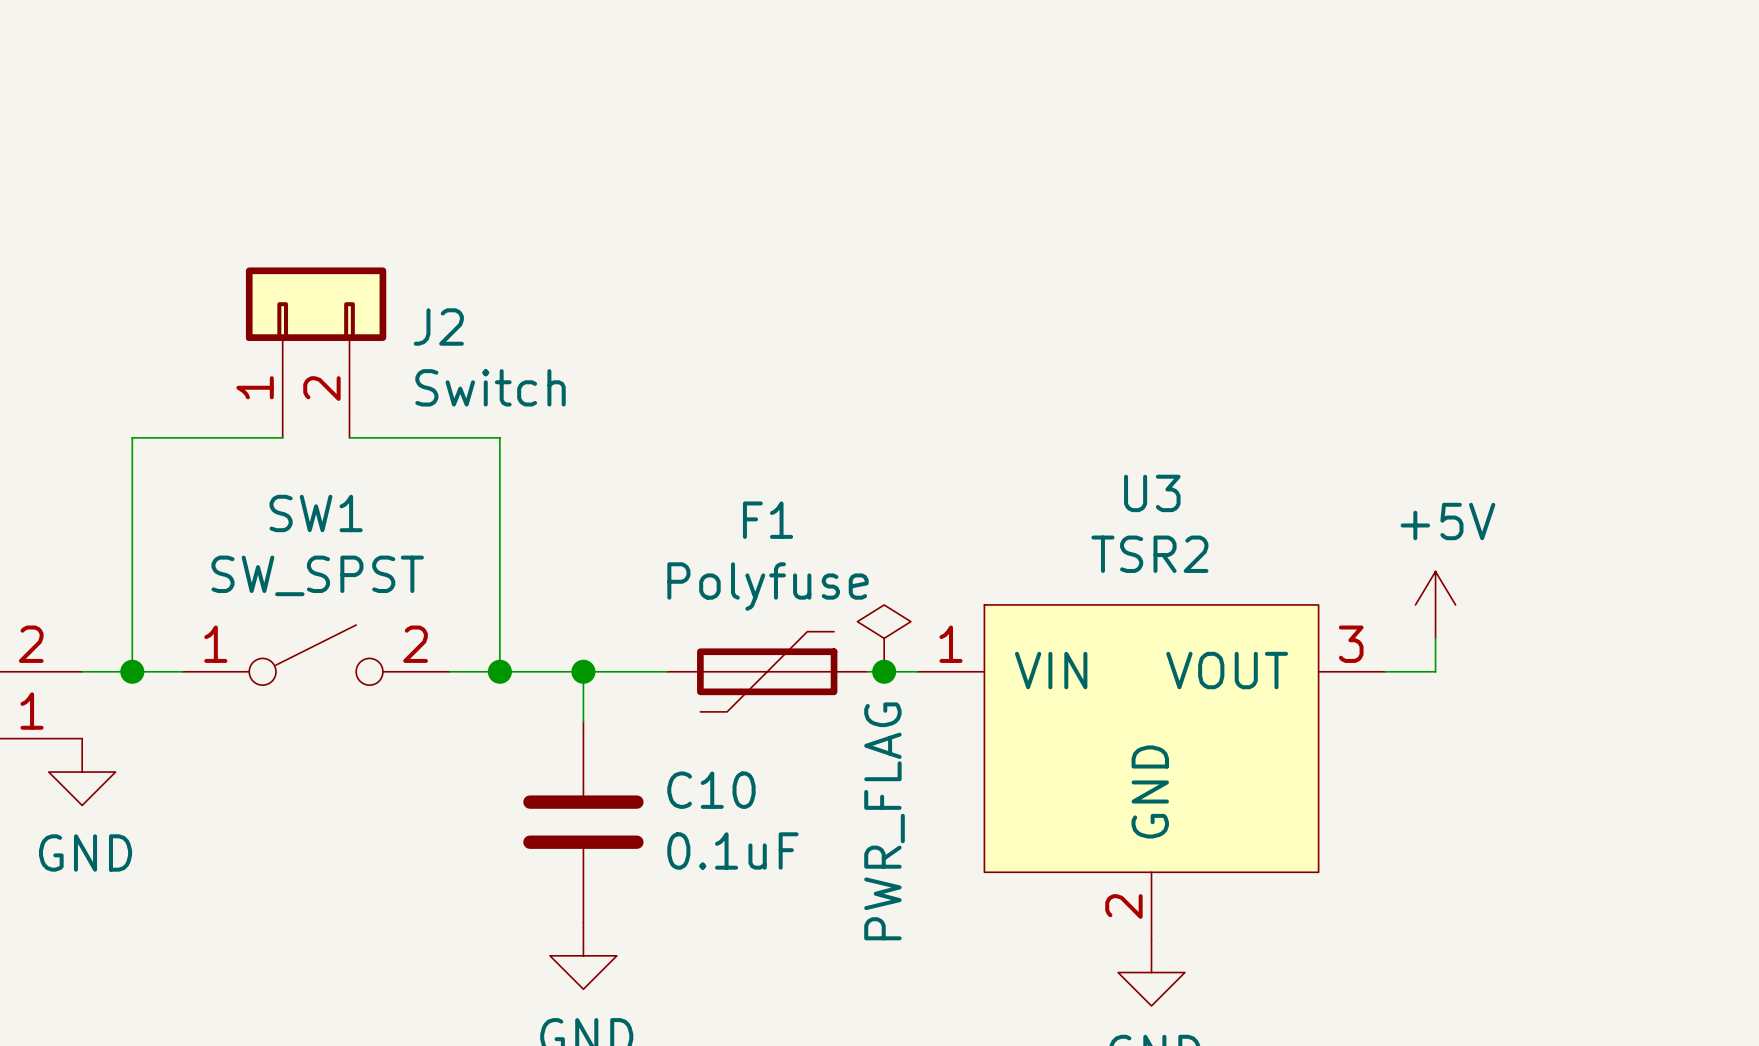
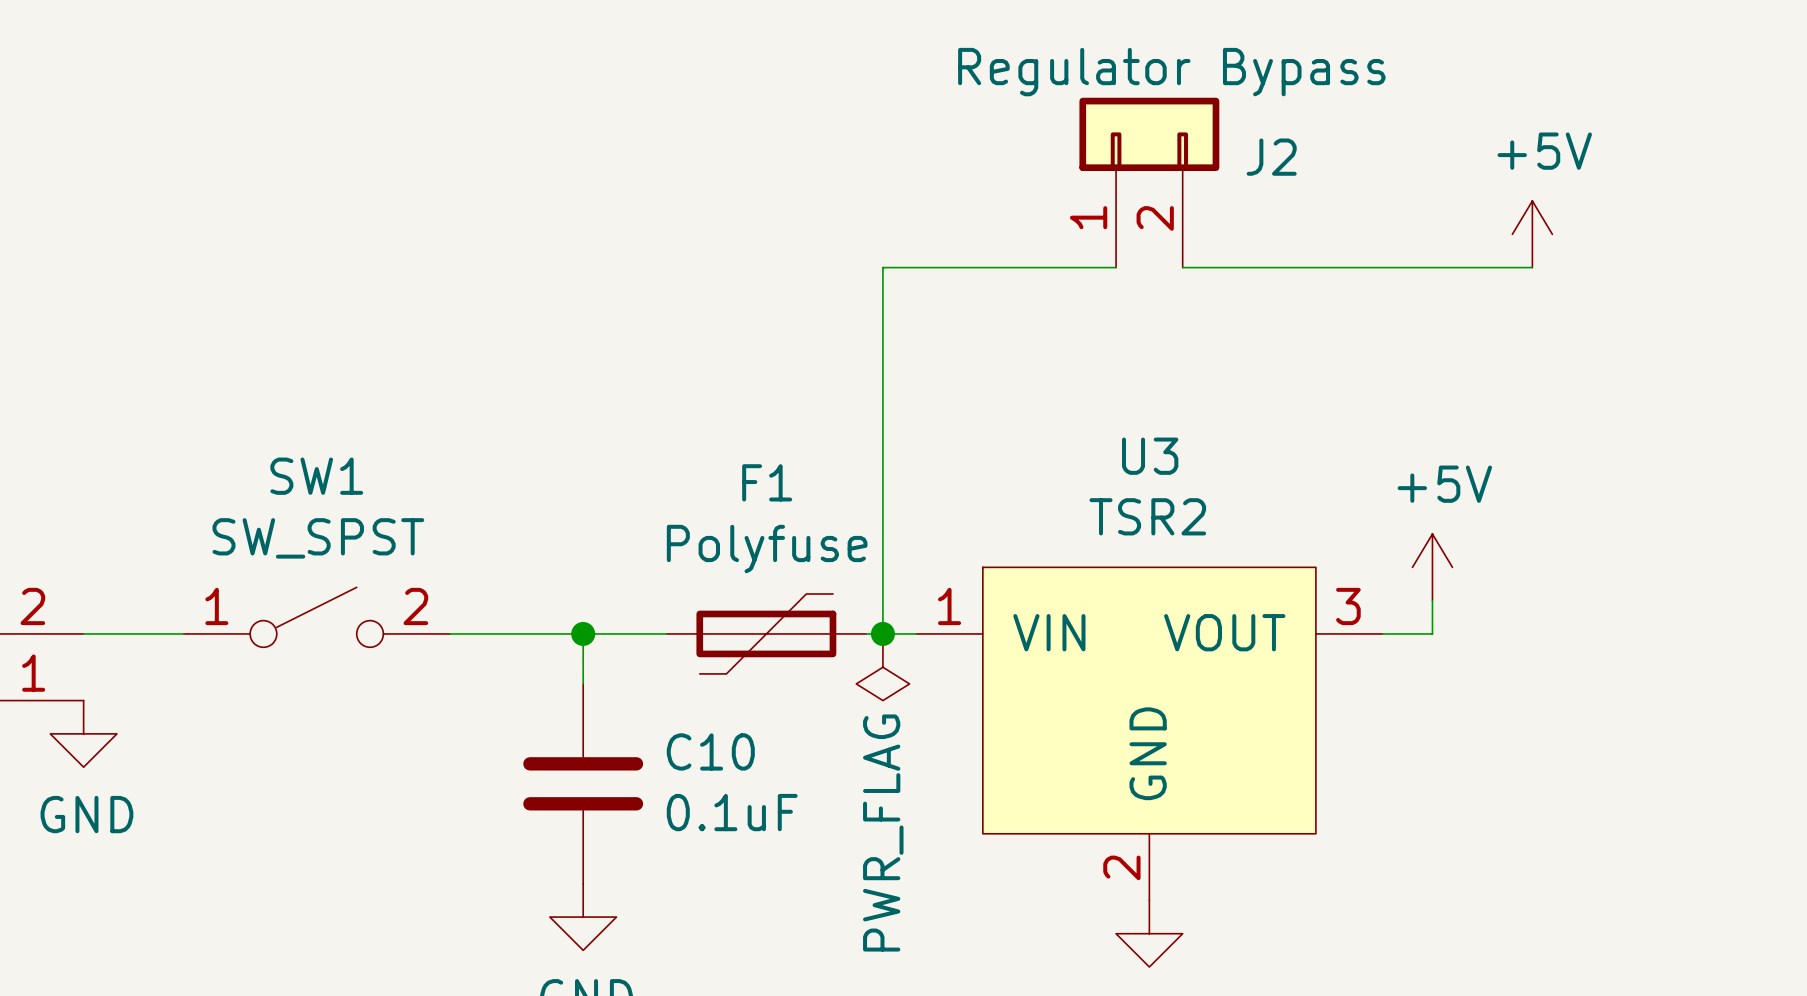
power symbol: none -> +5V (1532, 234)
wire: none -> (1116, 267) (882, 267) (882, 633)
wire: none -> (1182, 267) (1532, 267)
J2 position: (316, 352) -> (1149, 182)
J2 value: Switch (490, 387) -> Regulator Bypass (1171, 72)
wire: (282, 437) (132, 437) (132, 671) -> none
wire: (349, 437) (499, 437) (499, 671) -> none
power symbol rotation: 0° (884, 638) -> 180° (882, 667)
power symbol position: PWR_FLAG (884, 638) -> PWR_FLAG (882, 667)
junction: (132, 671) -> none
junction: (499, 671) -> none

